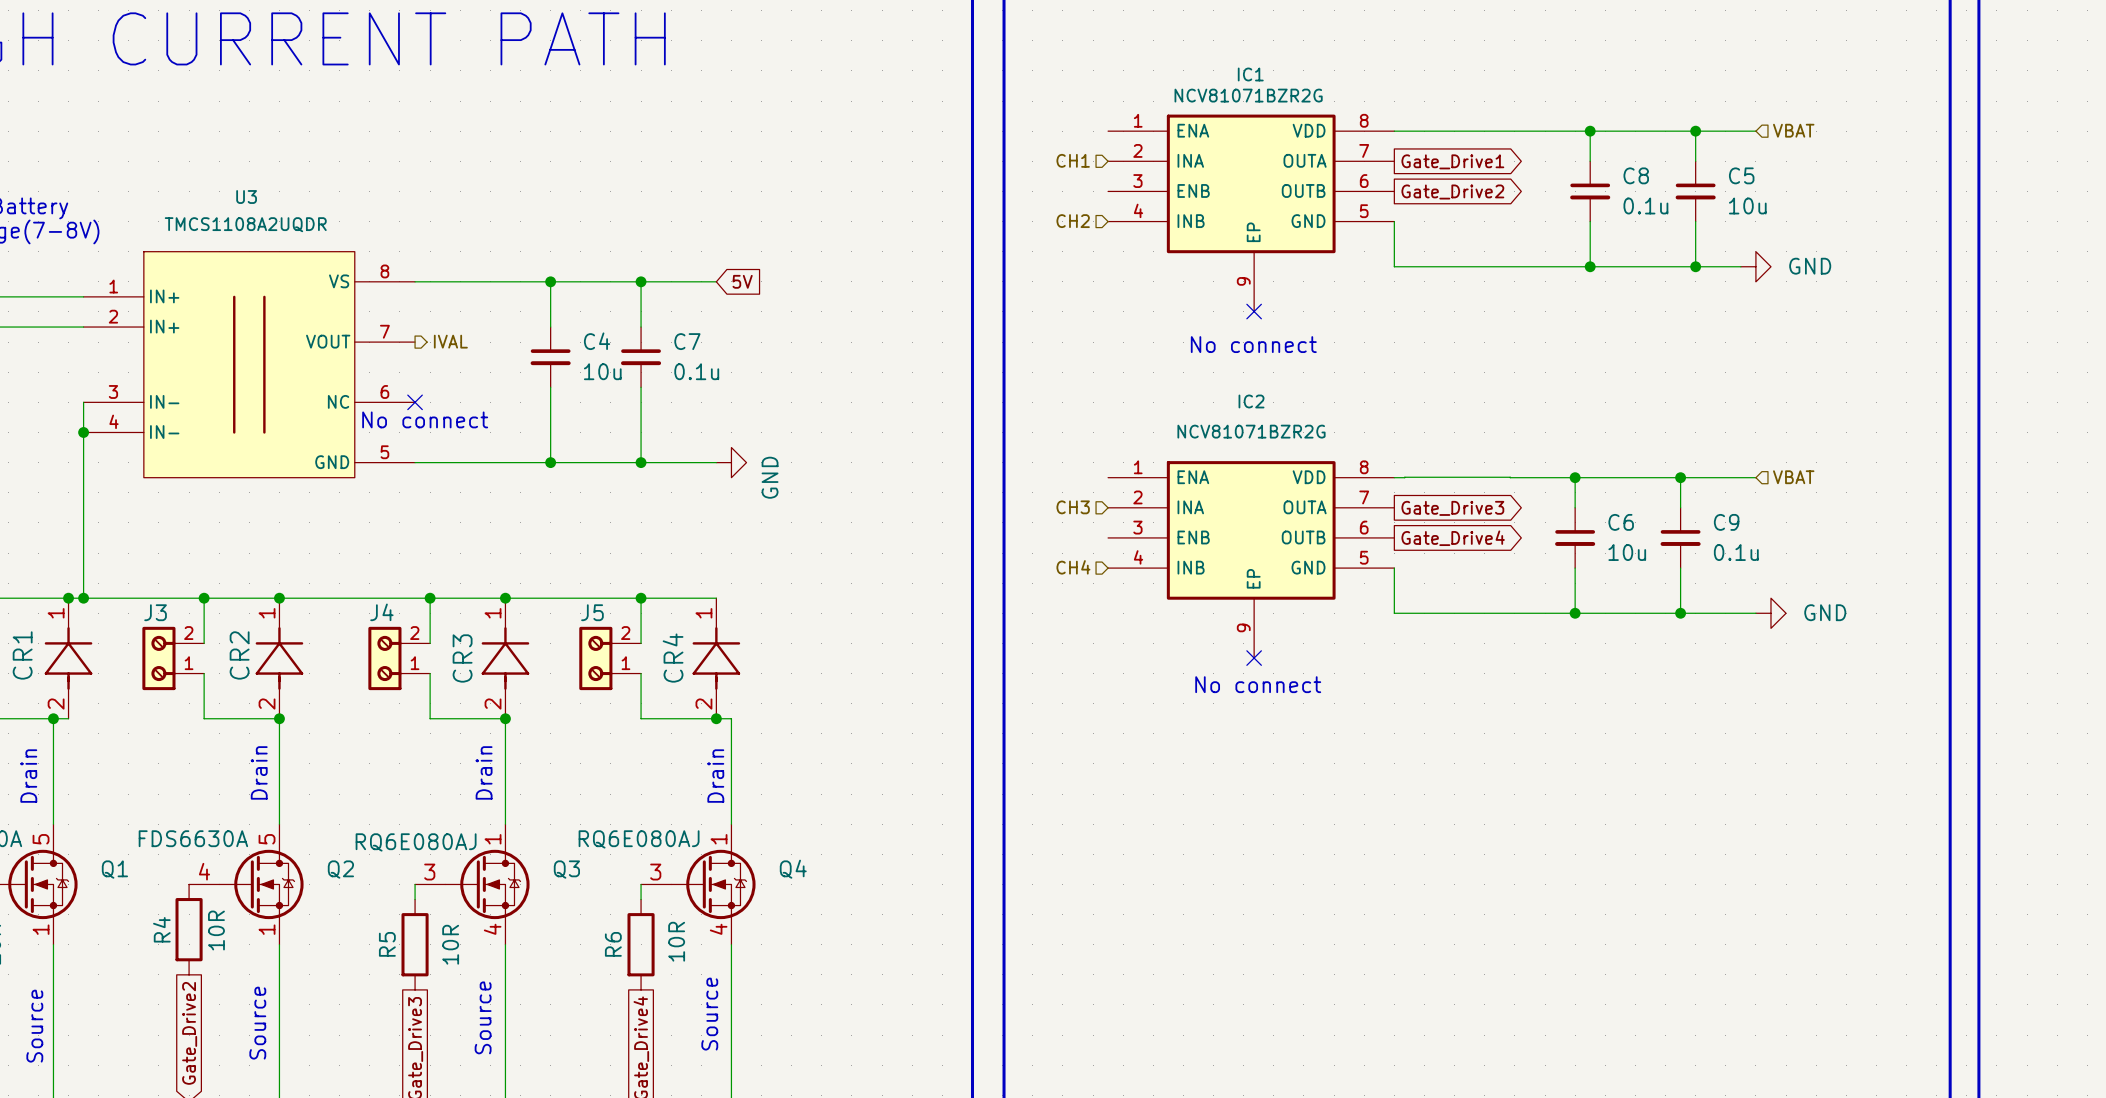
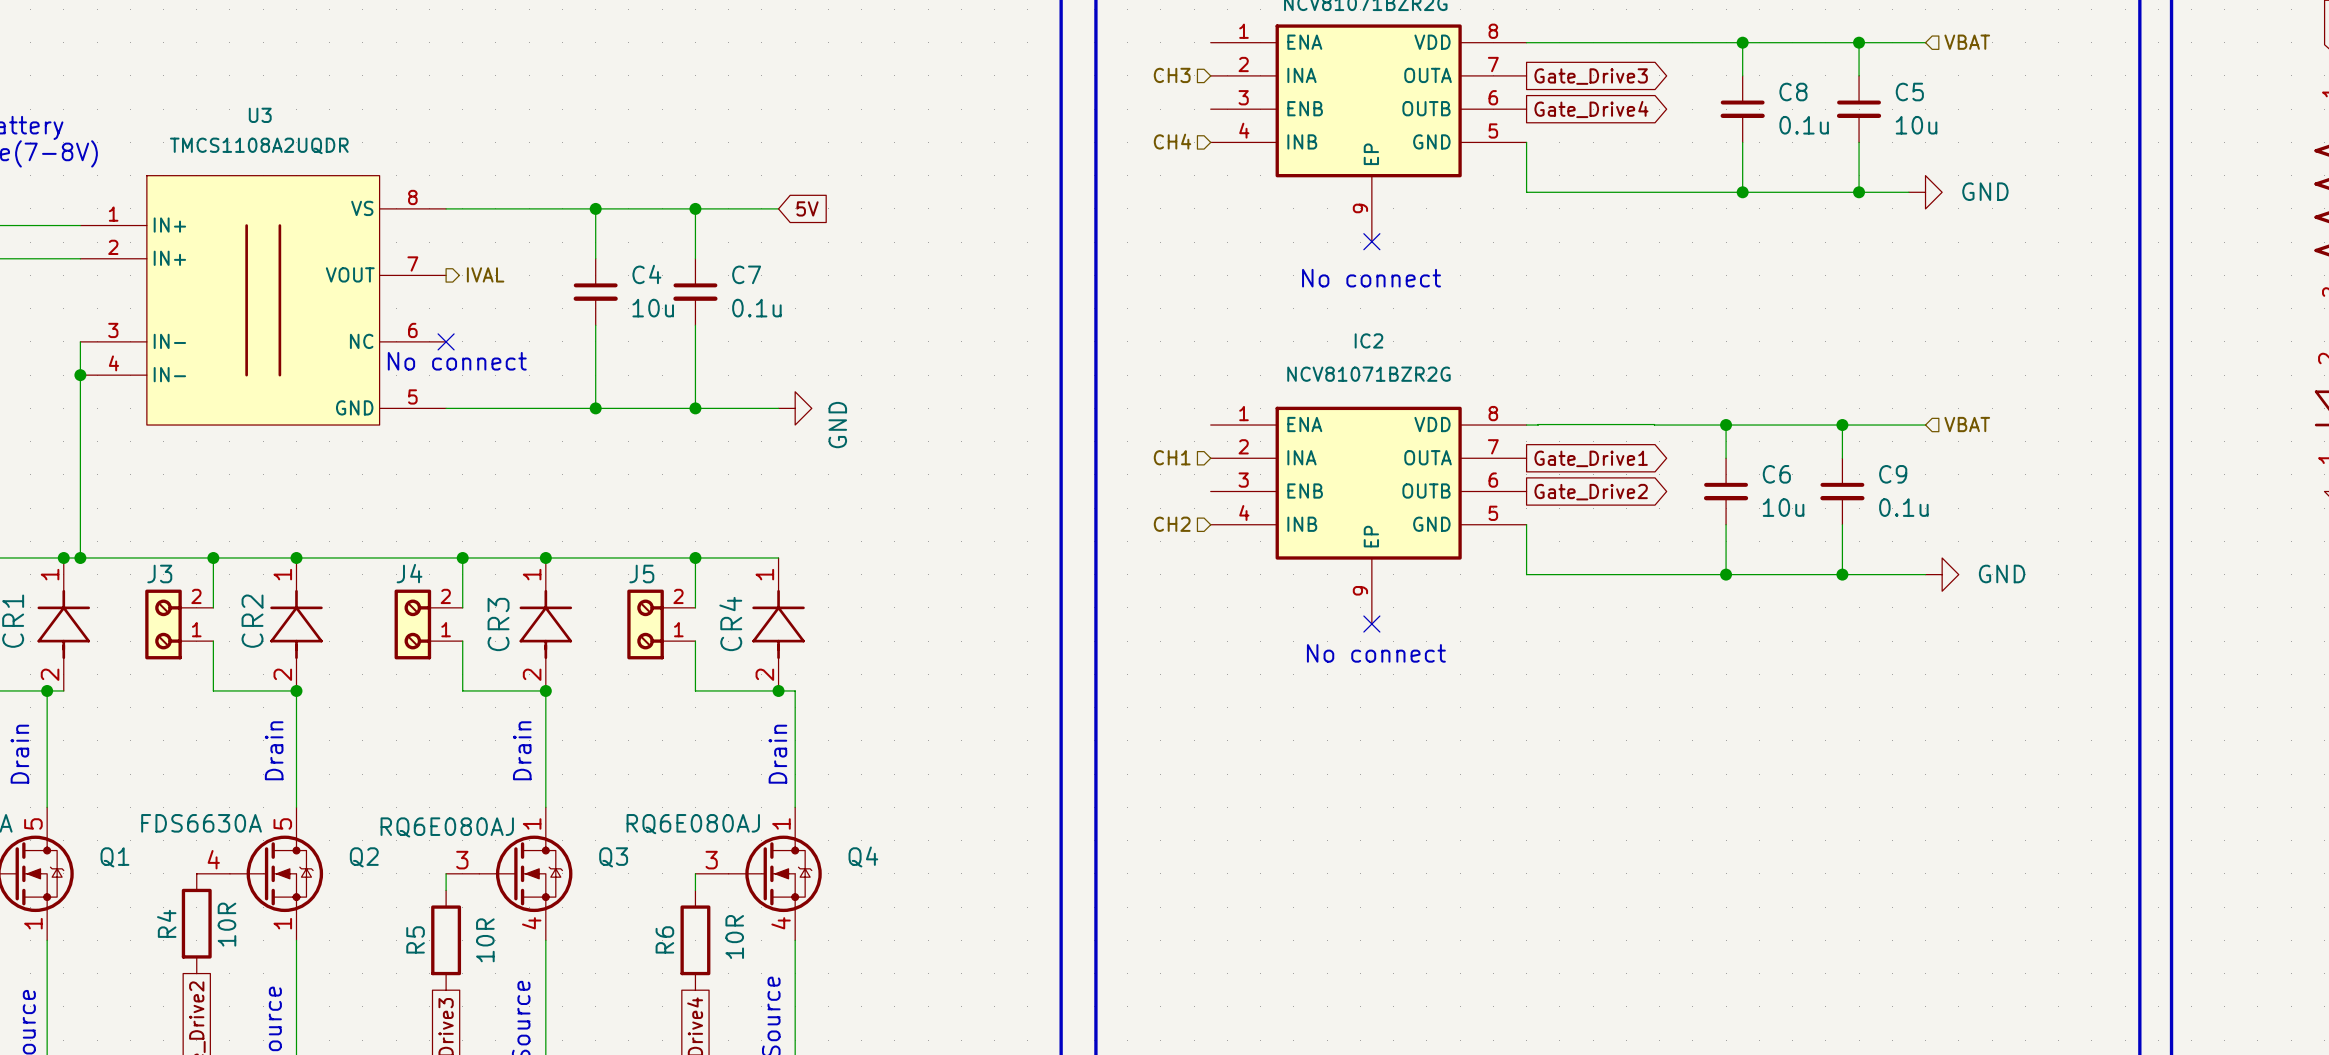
hierarchical label: CH1 (1073, 160) -> CH3 (1172, 75)
global label: Gate_Drive1 (1452, 161) -> Gate_Drive3 (1591, 76)
global label: Gate_Drive2 (1452, 192) -> Gate_Drive4 (1591, 109)
hierarchical label: CH2 (1073, 221) -> CH4 (1172, 141)
hierarchical label: CH3 (1073, 507) -> CH1 (1172, 457)
global label: Gate_Drive3 (1452, 508) -> Gate_Drive1 (1591, 458)
global label: Gate_Drive4 (1453, 538) -> Gate_Drive2 (1591, 492)
hierarchical label: CH4 (1073, 567) -> CH2 (1172, 524)

